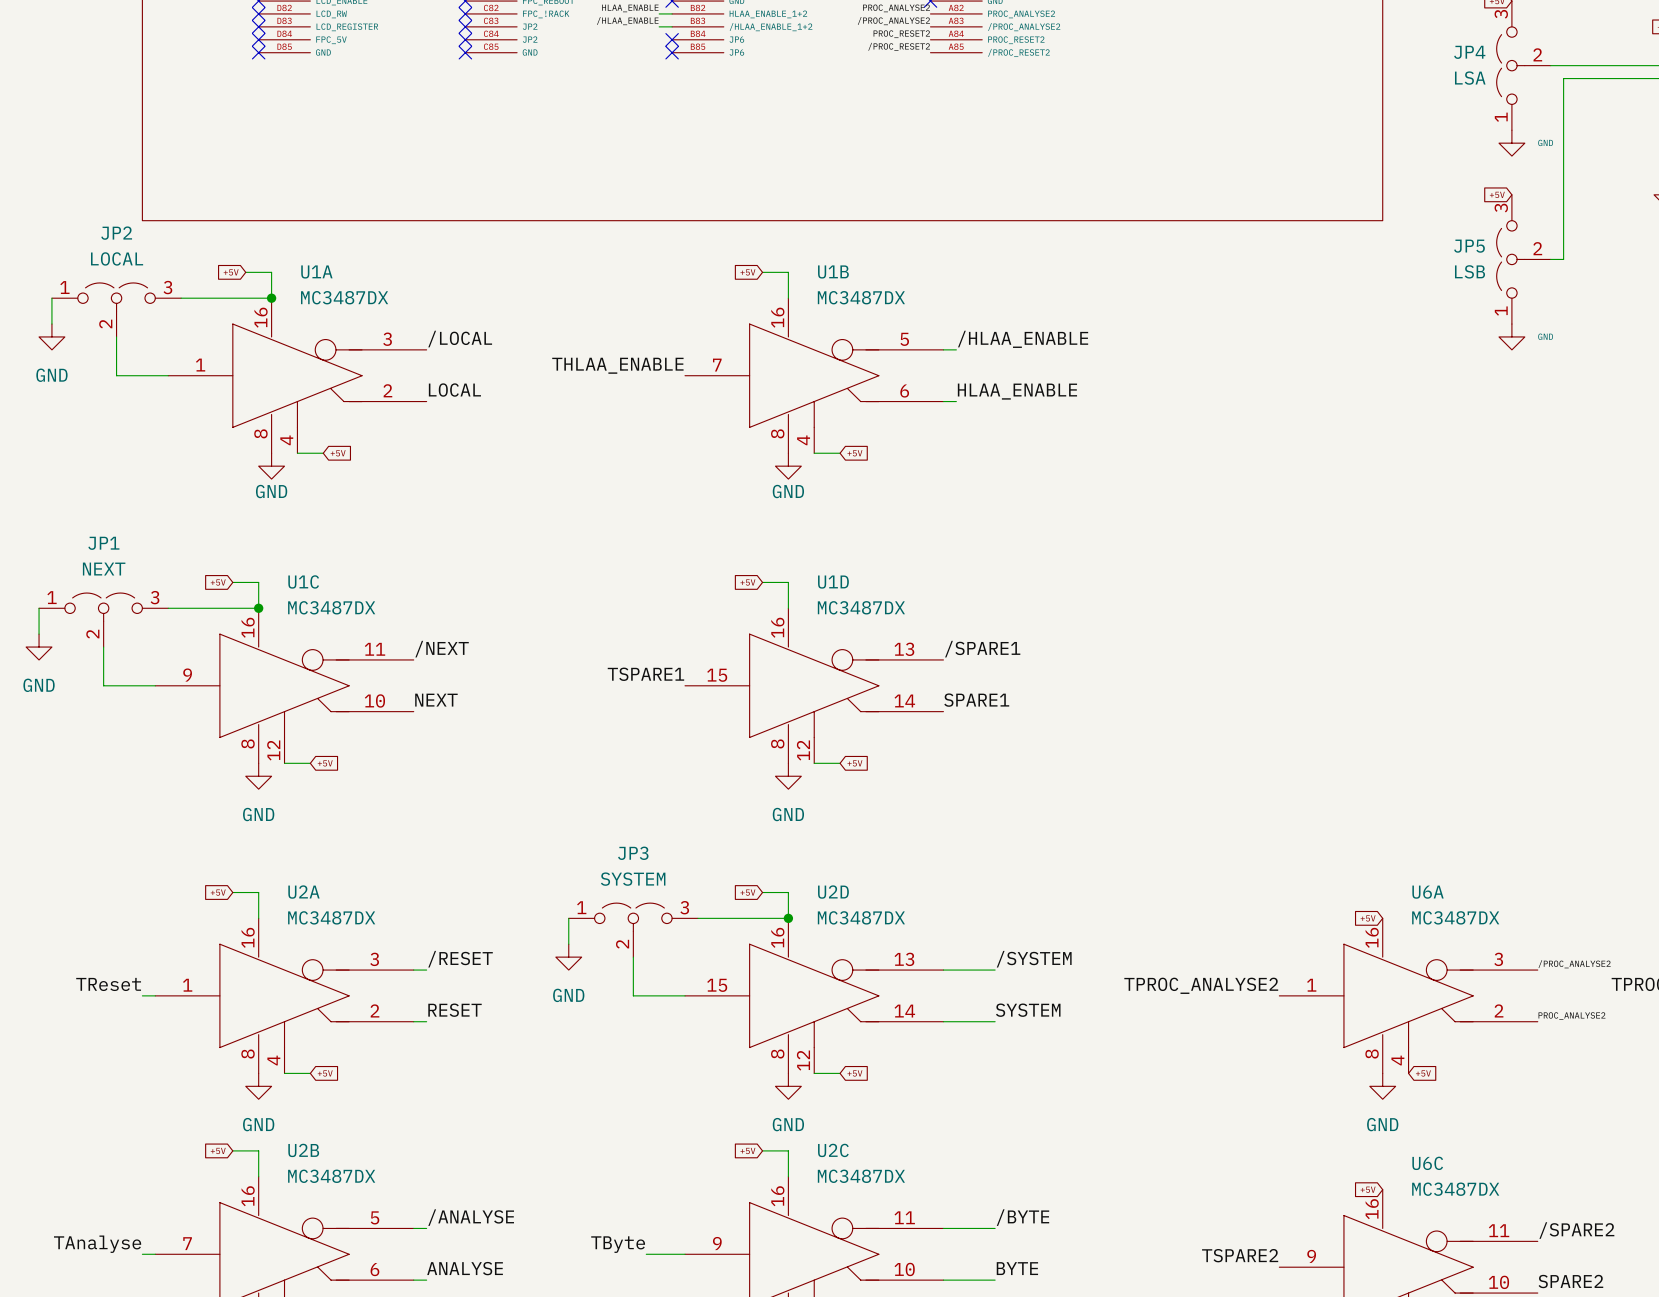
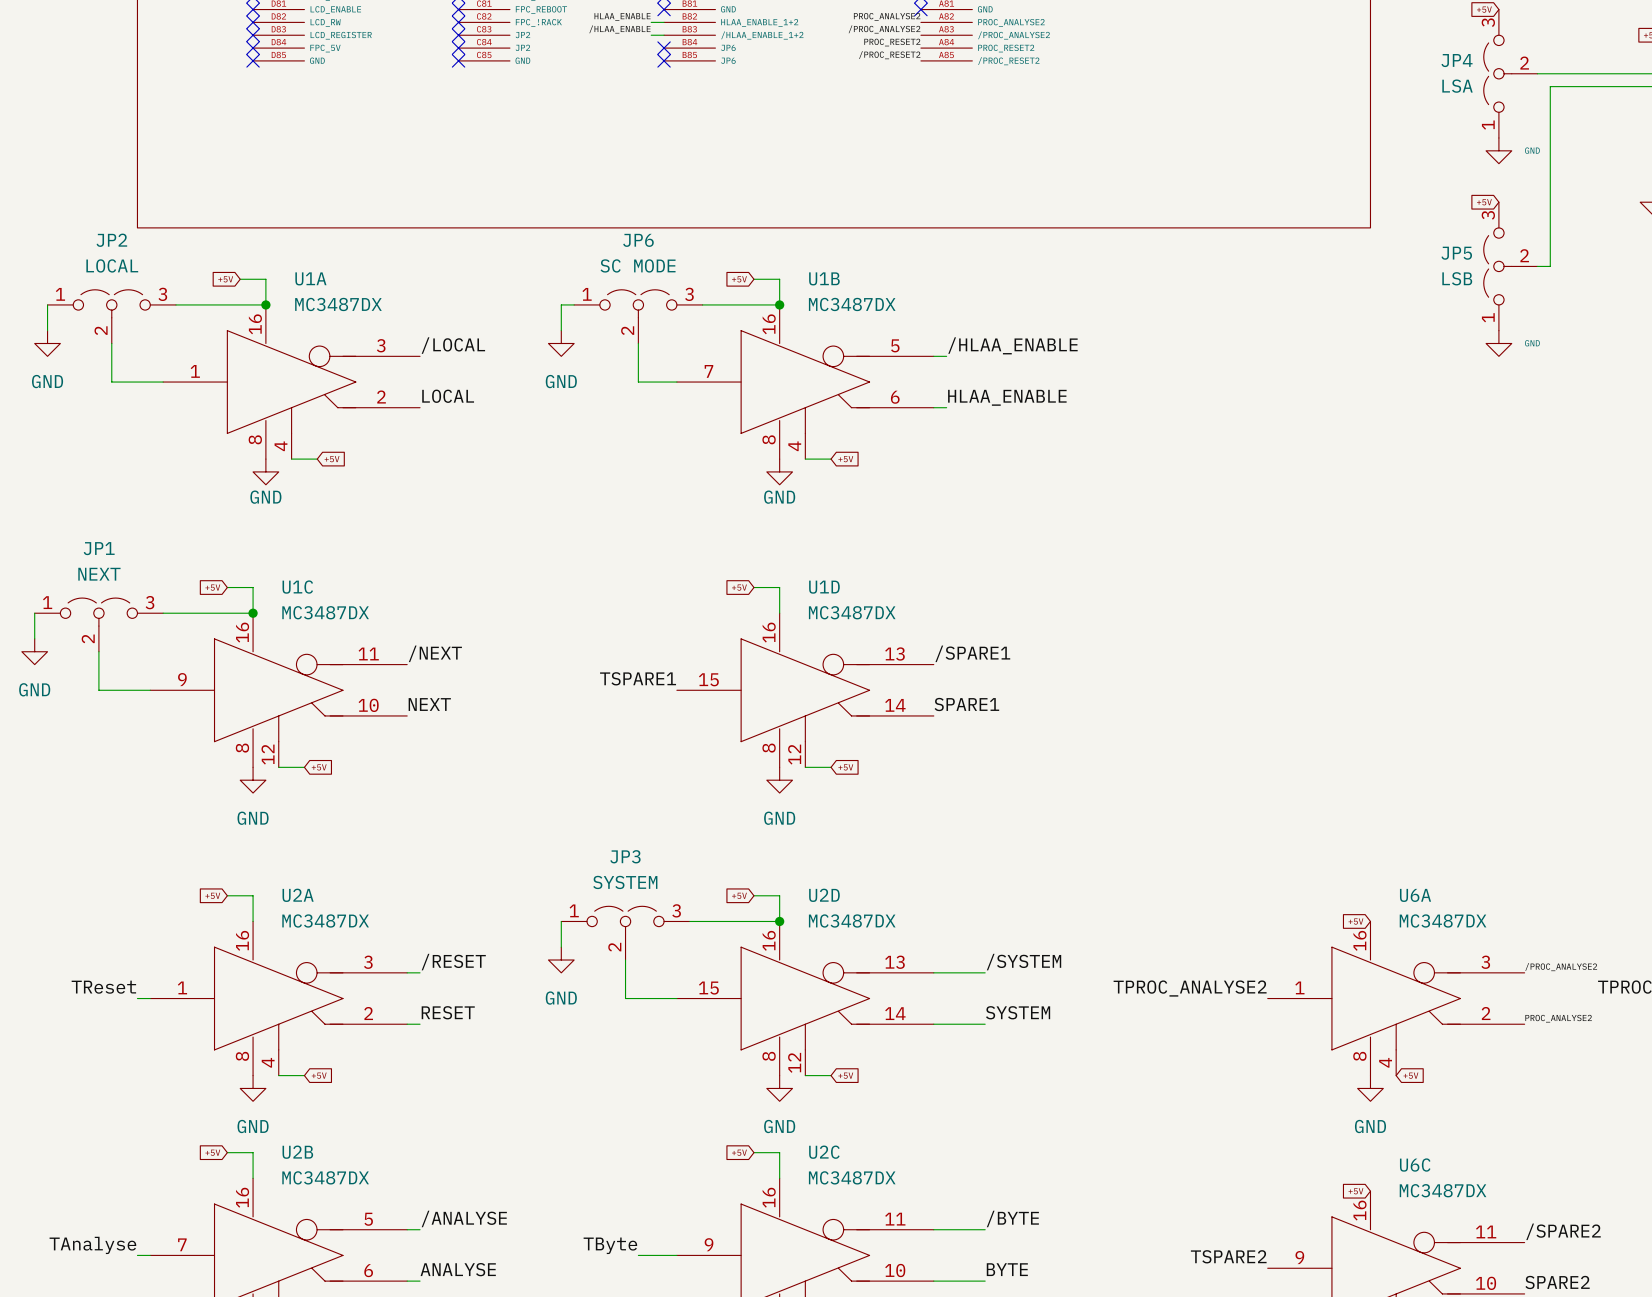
wire: none -> (574, 304) (561, 304) (561, 330)
wire: none -> (702, 304) (779, 304)
junction: none -> (779, 304)
JP6: none -> SC MODE (638, 316)
power symbol: none -> GND (561, 343)
wire: none -> (638, 343) (638, 382) (676, 382)
label: THLAA_ENABLE (617, 365) -> none

